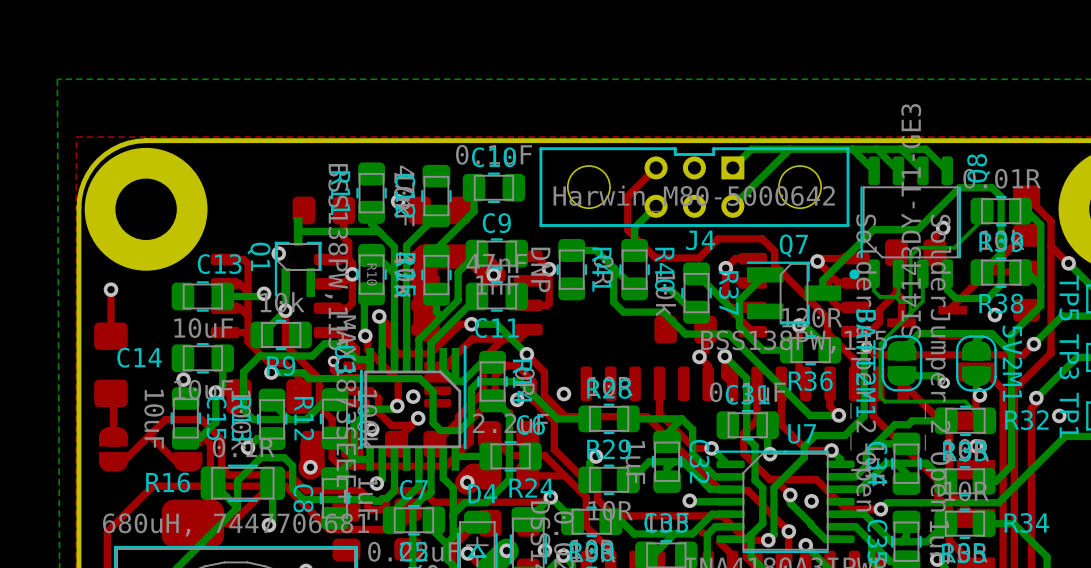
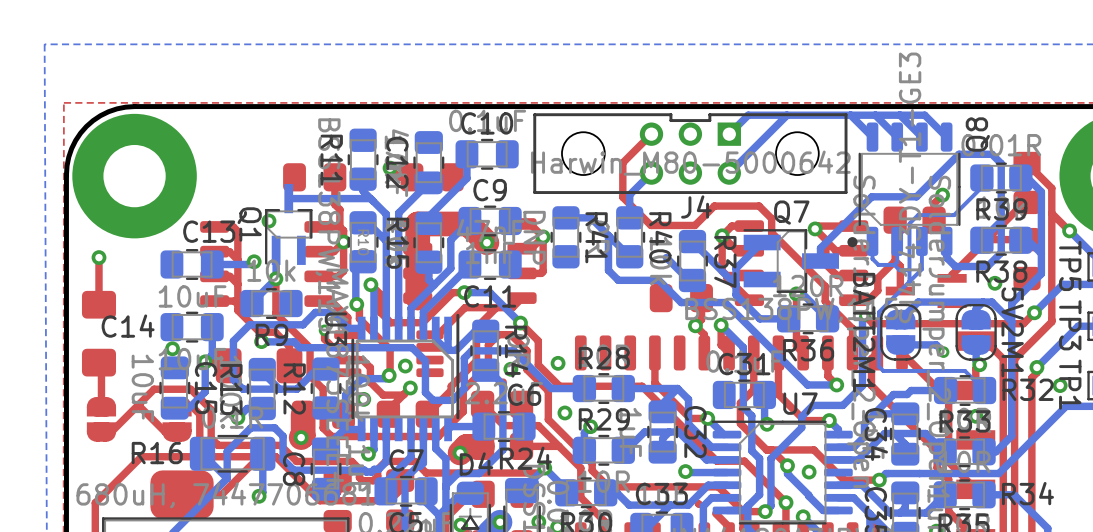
via: none -> (564, 412)

